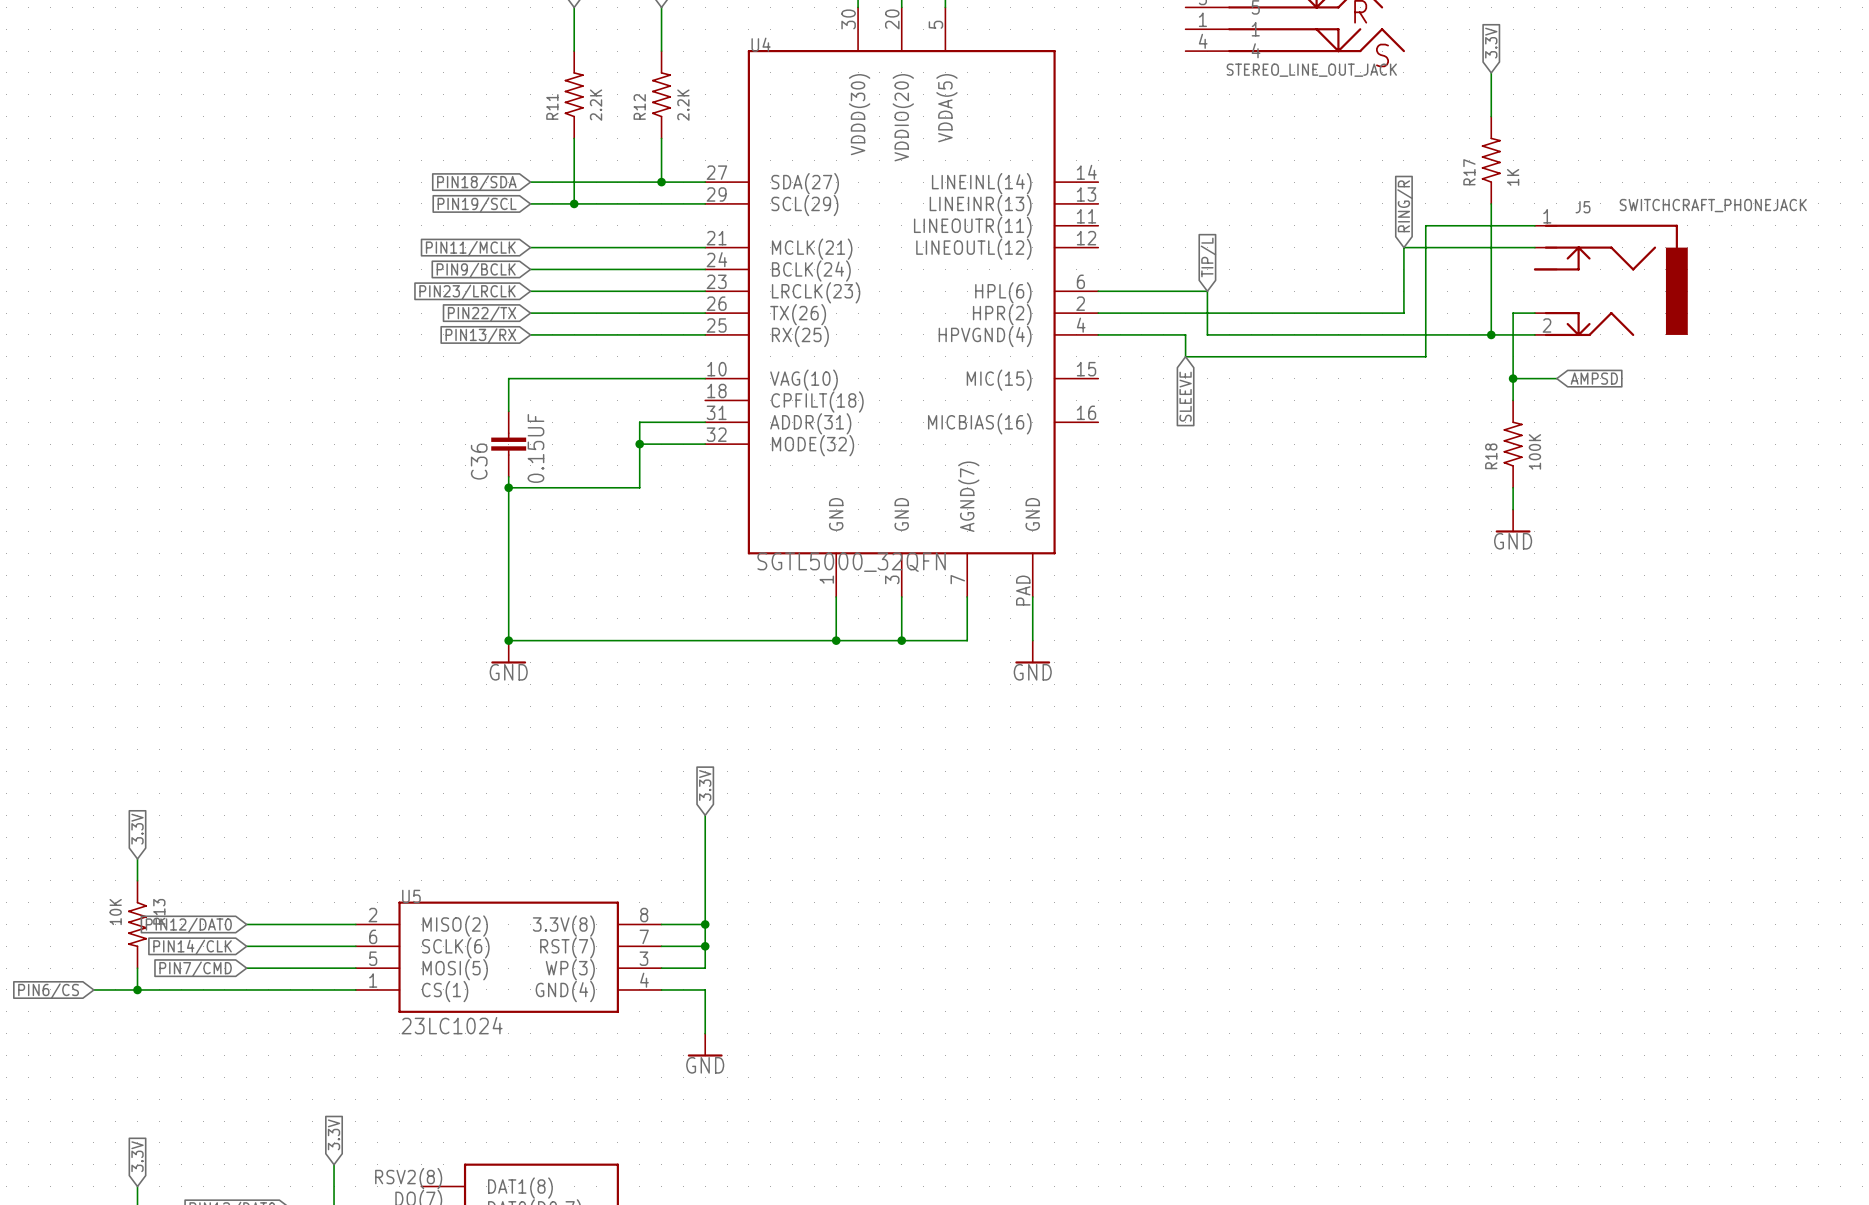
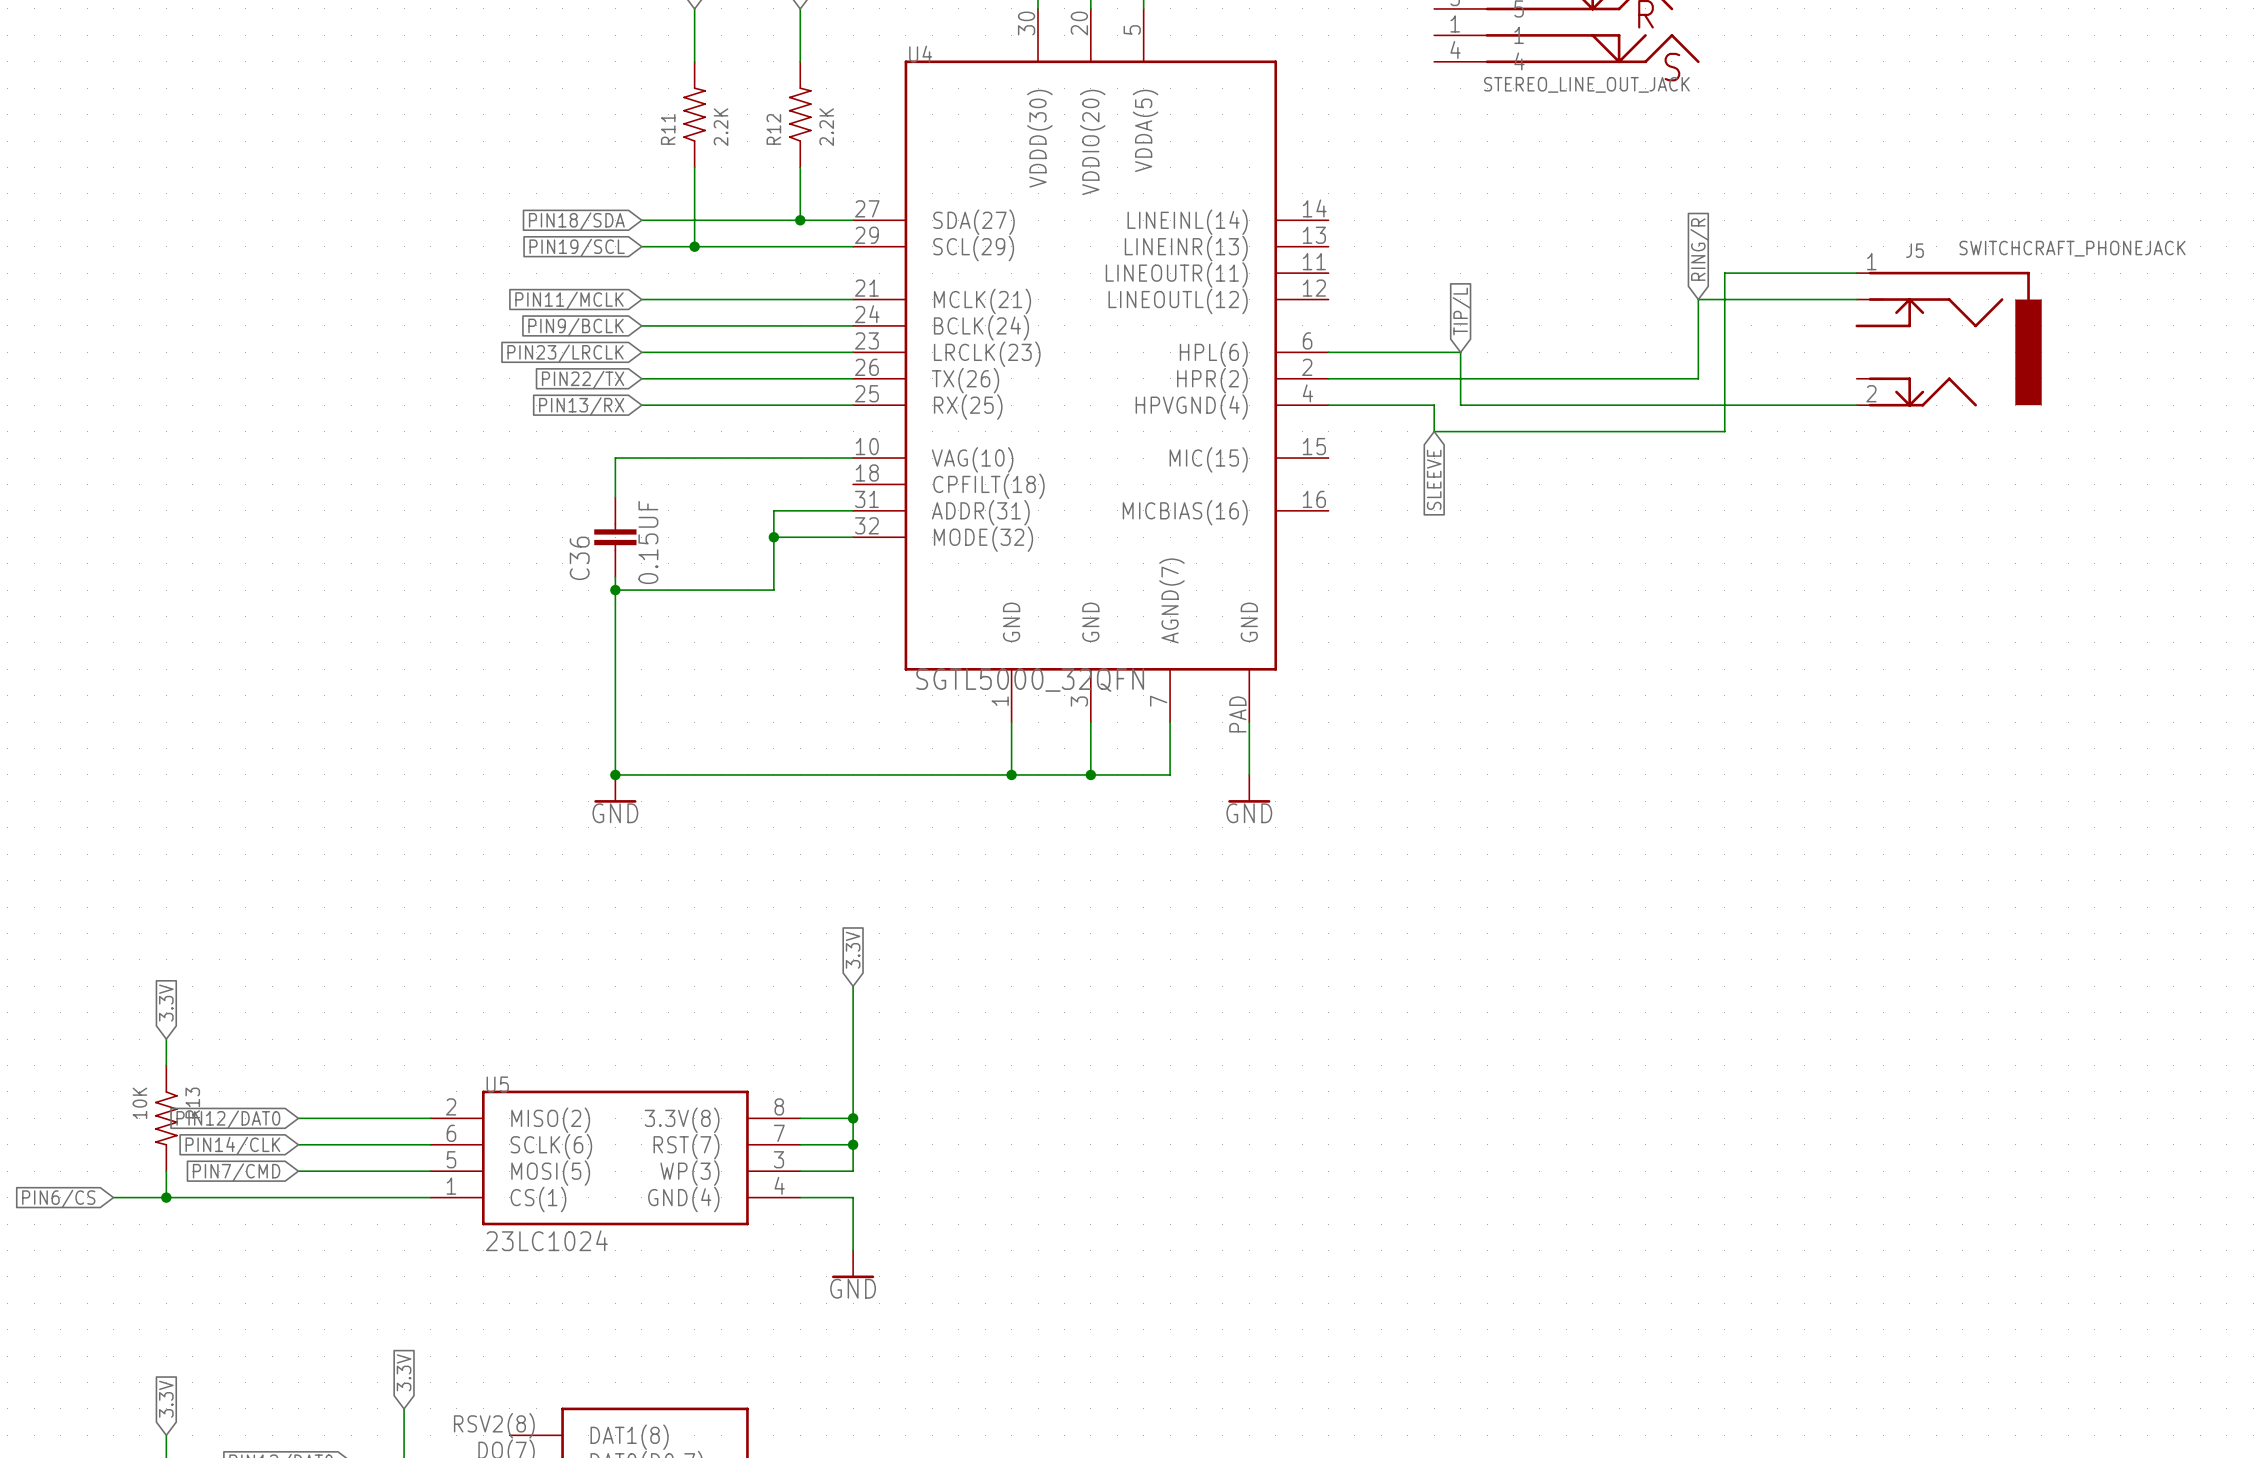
global label: 3.3V (1491, 43) -> none
wire: (1491, 72) (1491, 116) -> none
R17: 1K (1491, 160) -> none
wire: (1491, 203) (1491, 334) -> none
wire: (1534, 313) (1513, 313) (1513, 400) -> none
junction: (1491, 334) -> none
wire: (1513, 378) (1556, 378) -> none
junction: (1513, 378) -> none
global label: AMPSD (1594, 378) -> none
R18: 100K (1513, 444) -> none
wire: (1513, 487) (1513, 509) -> none
power symbol: GND (1513, 521) -> none

